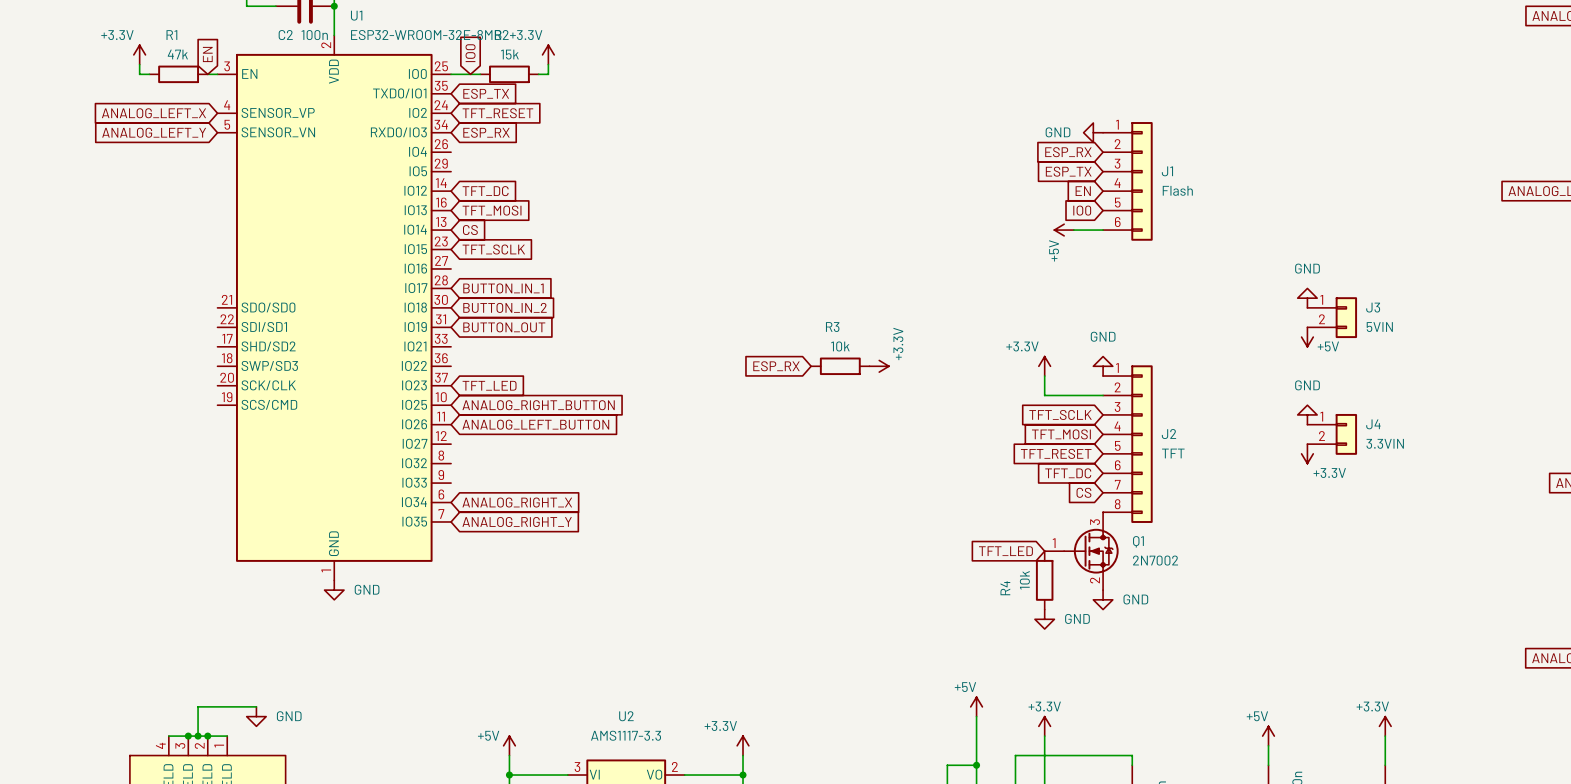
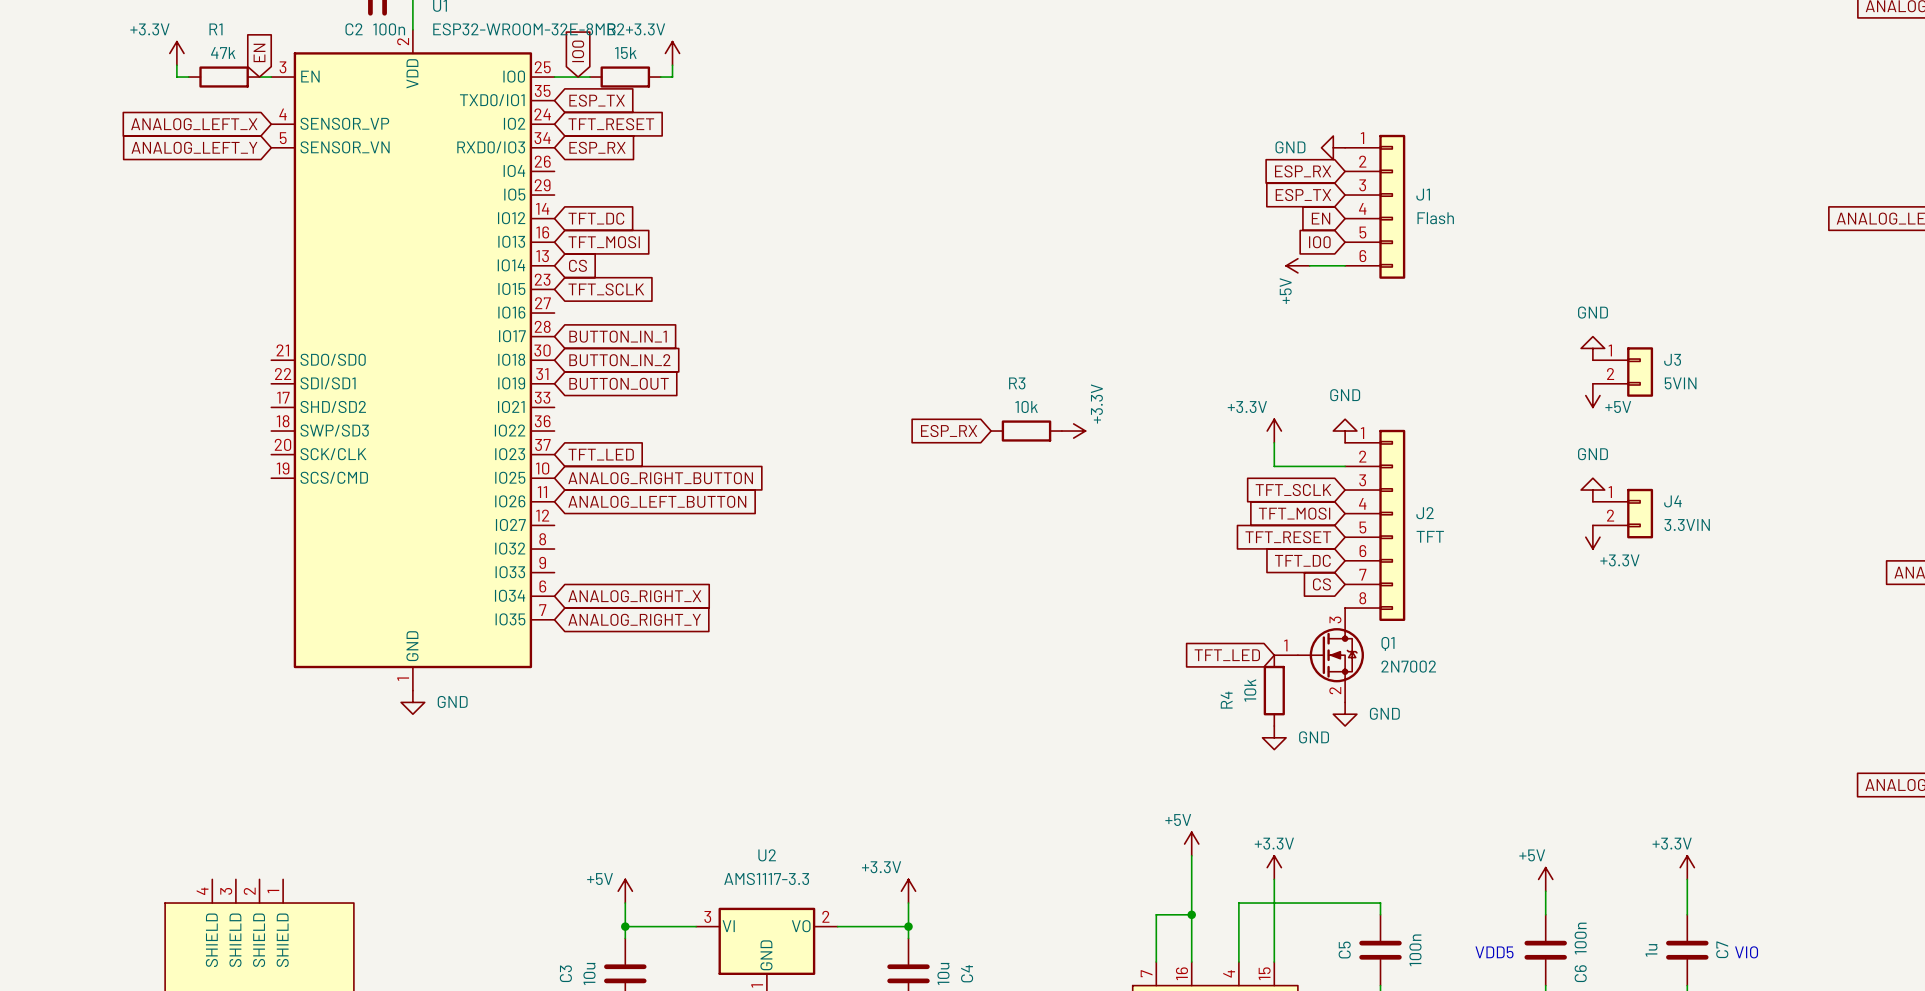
wire: (256, 706) (198, 706) (198, 736) -> none
power symbol: GND (256, 716) -> none
wire: (168, 736) (227, 736) -> none
junction: (188, 736) -> none
junction: (198, 736) -> none
junction: (207, 736) -> none

